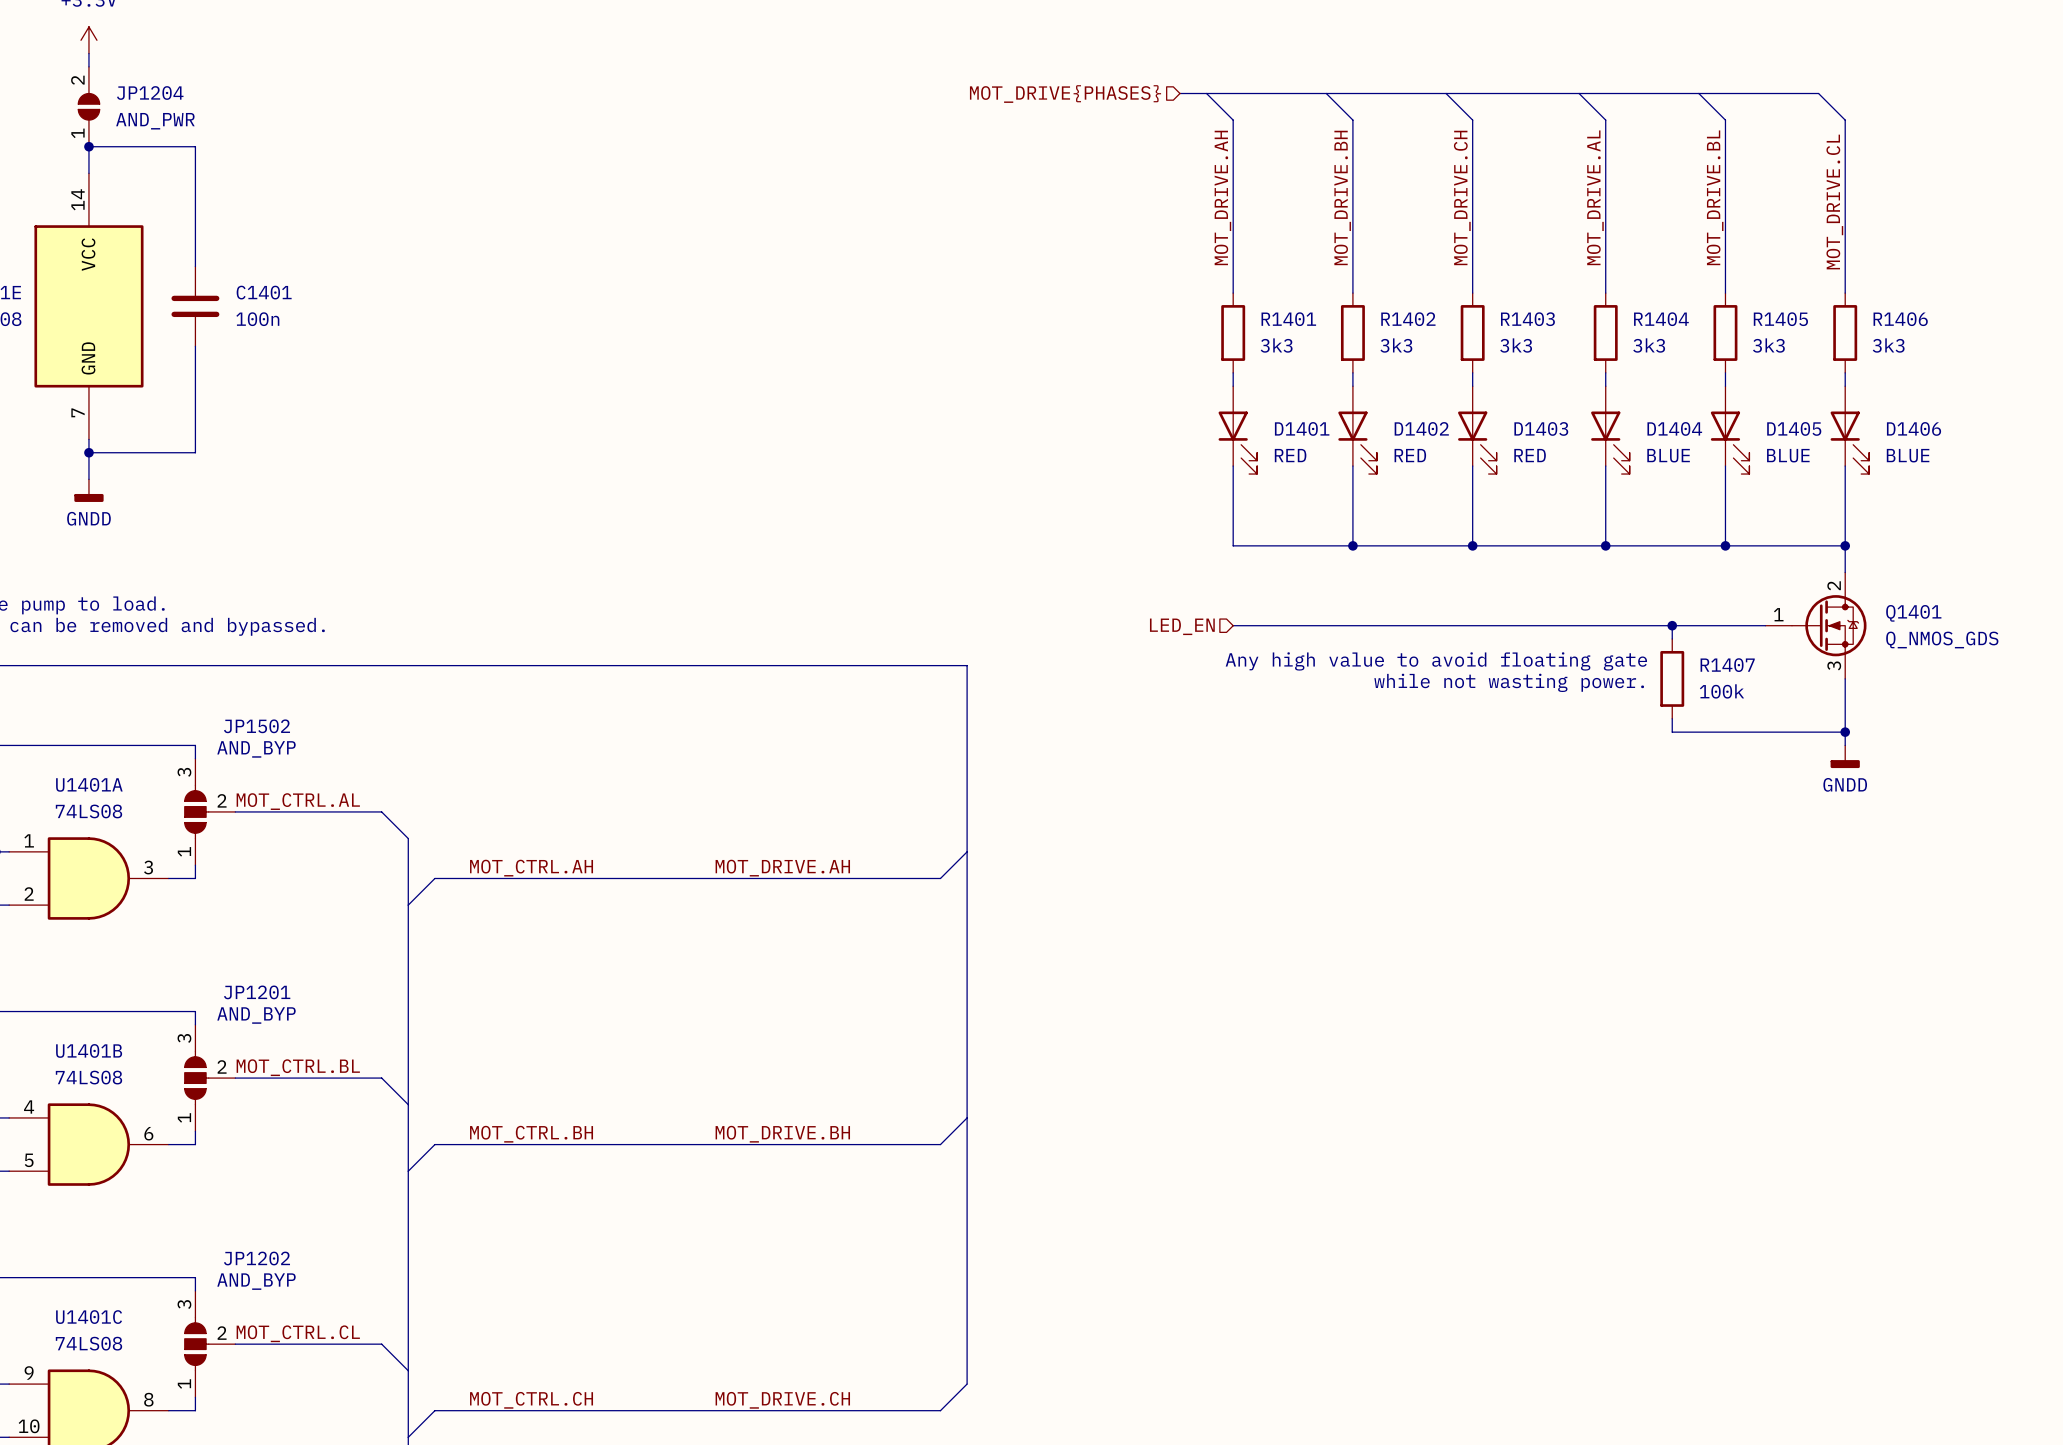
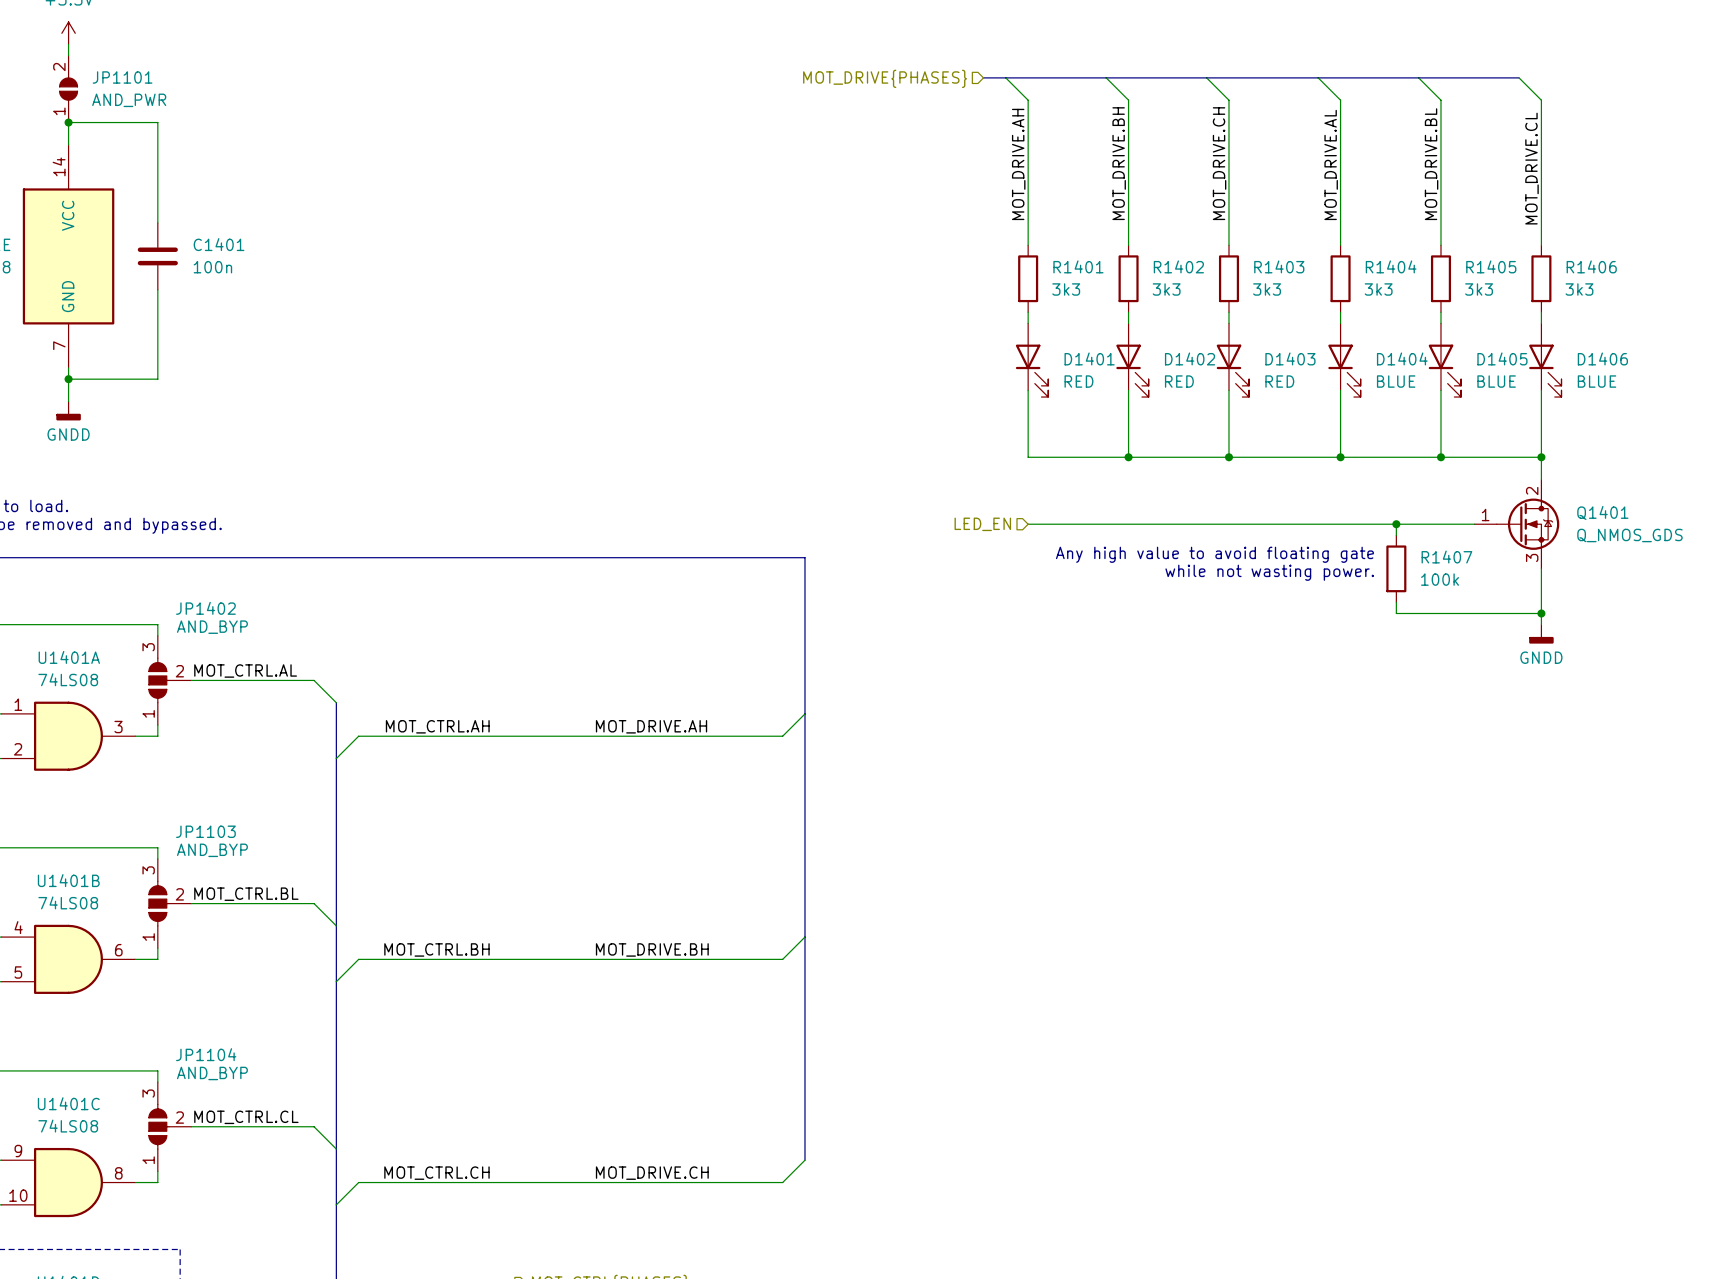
JP1204 name: JP1204 (150, 93) -> JP1101 (122, 77)
JP1502 name: JP1502 (257, 726) -> JP1402 (205, 608)
JP1201 name: JP1201 (257, 992) -> JP1103 (205, 831)
JP1202 name: JP1202 (257, 1258) -> JP1104 (206, 1054)

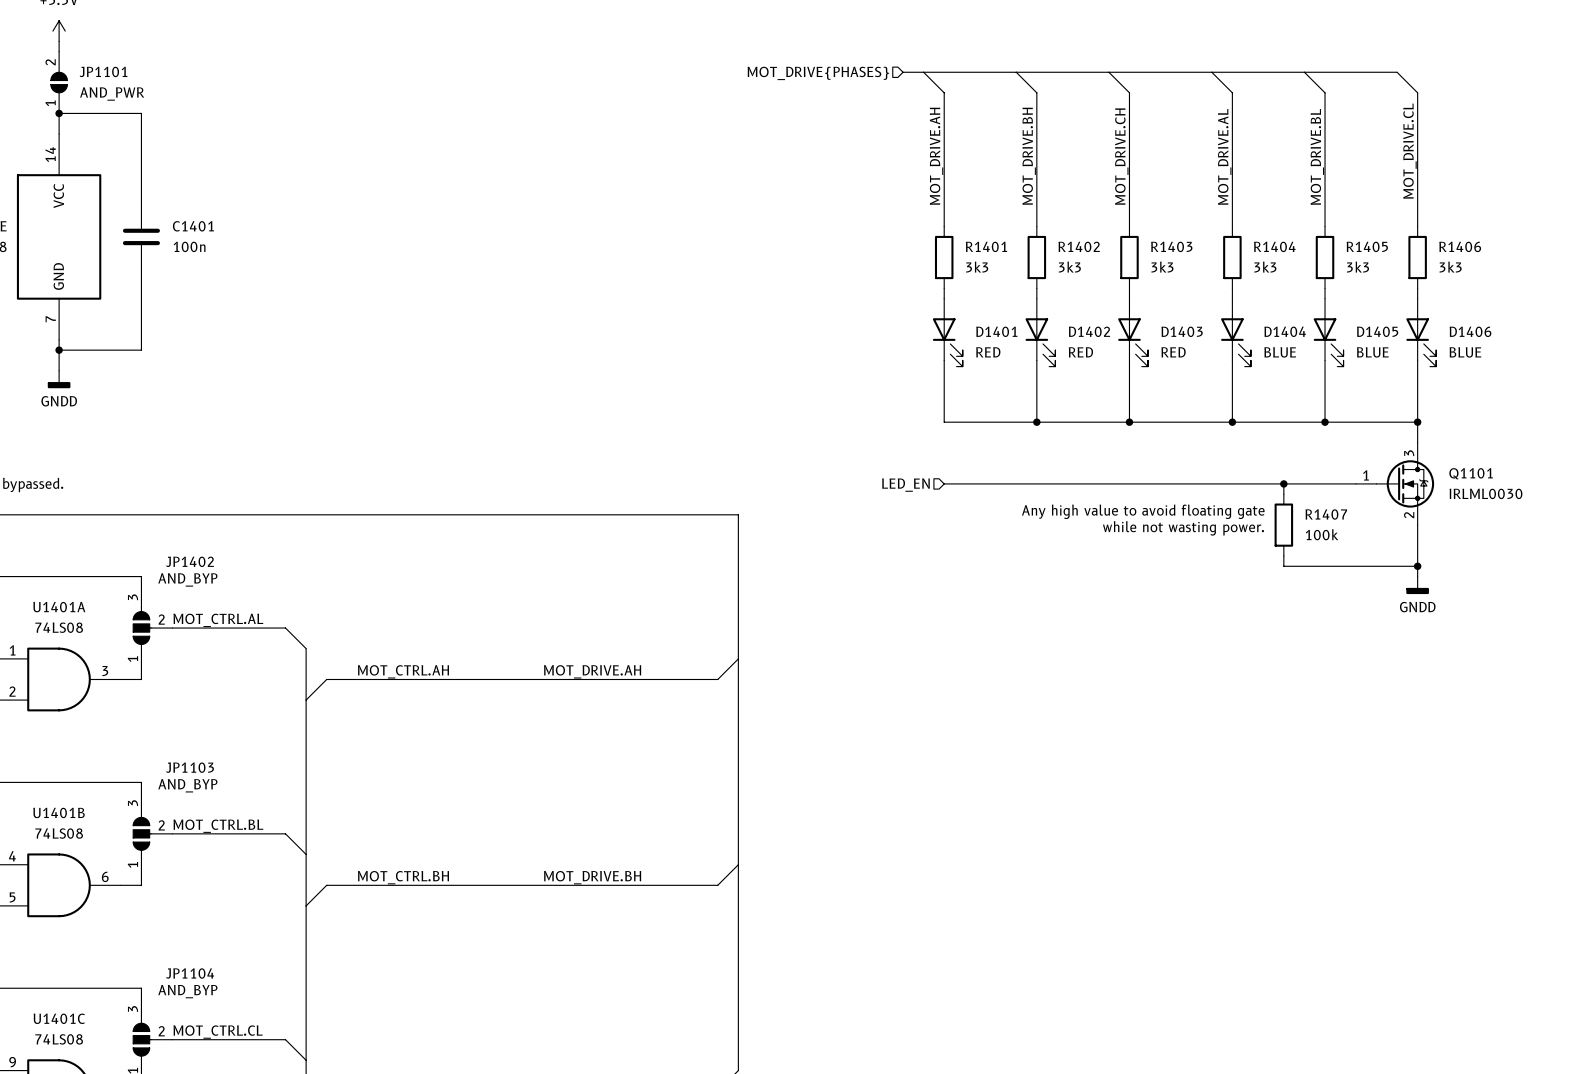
Q1401 pin number: 2 (1532, 491) -> 3 (1409, 453)
Q1401 name: Q1401 (1602, 512) -> Q1101 (1471, 473)
Q1401 value: Q_NMOS_GDS (1629, 535) -> IRLML0030 (1485, 493)
Q1401 pin number: 3 (1532, 557) -> 2 (1409, 515)

